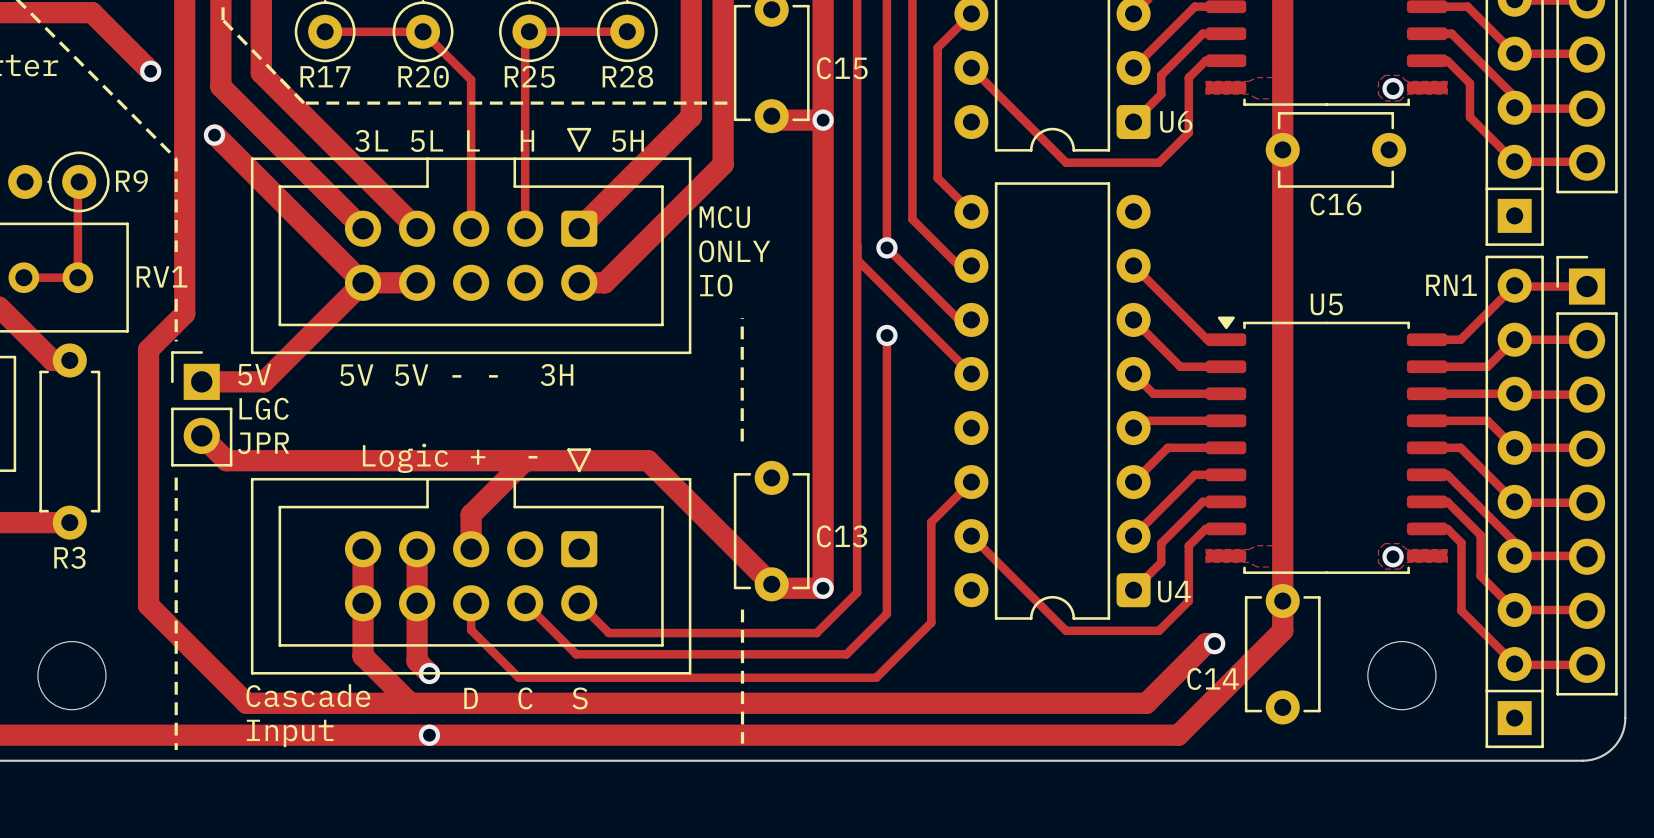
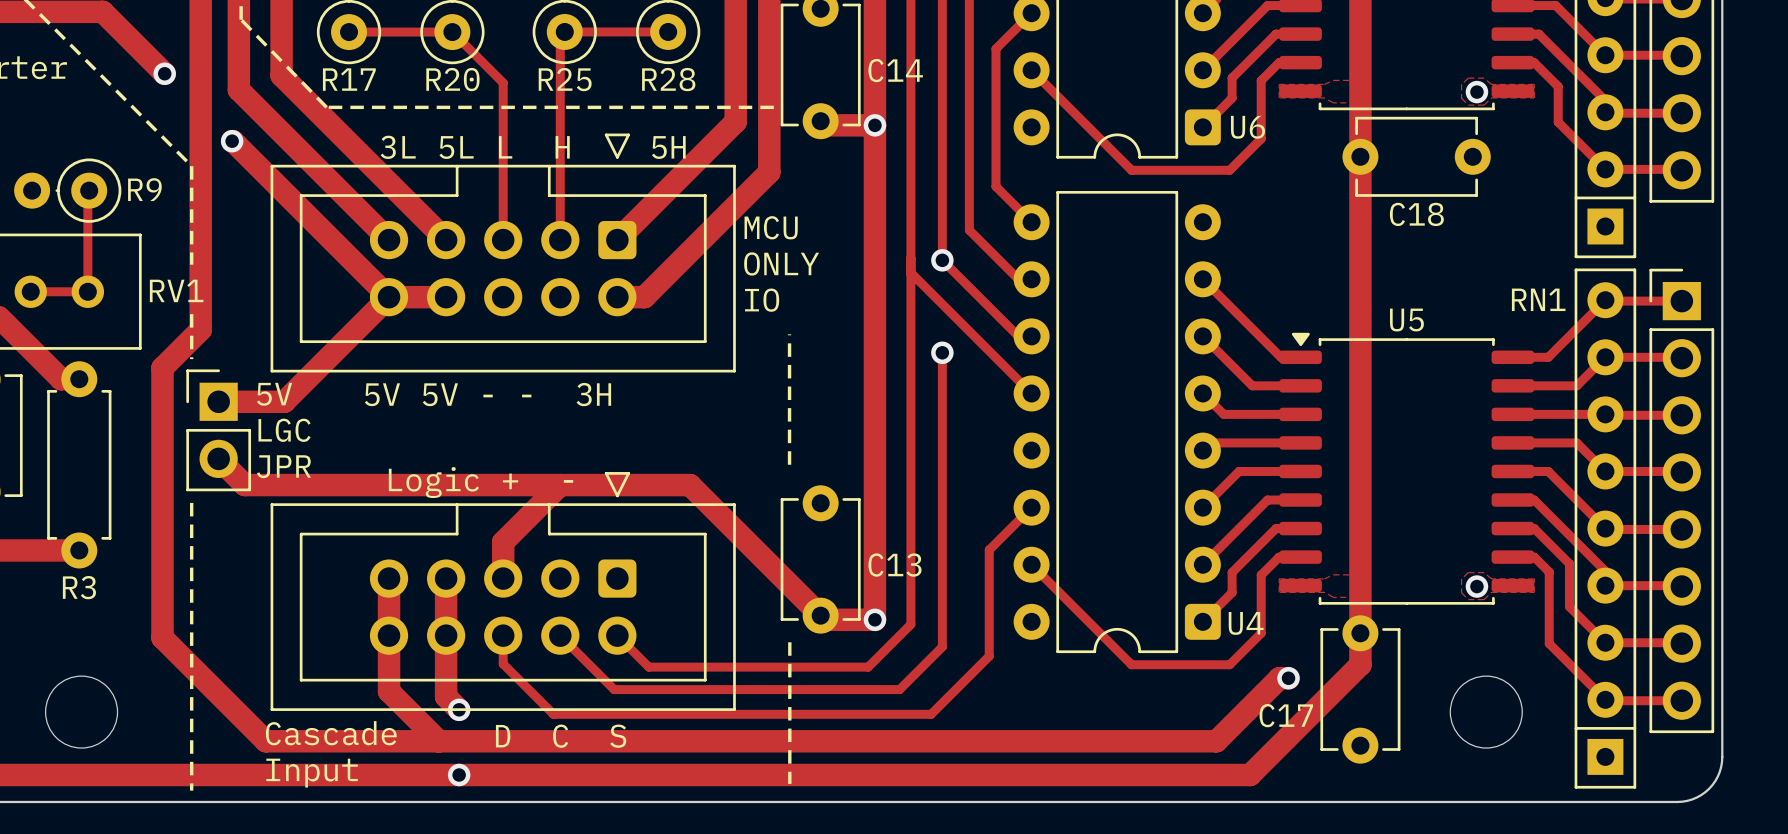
C15 name: C15 (842, 68) -> C14 (895, 70)
C16 name: C16 (1336, 204) -> C18 (1416, 214)
C14 name: C14 (1213, 678) -> C17 (1286, 715)

